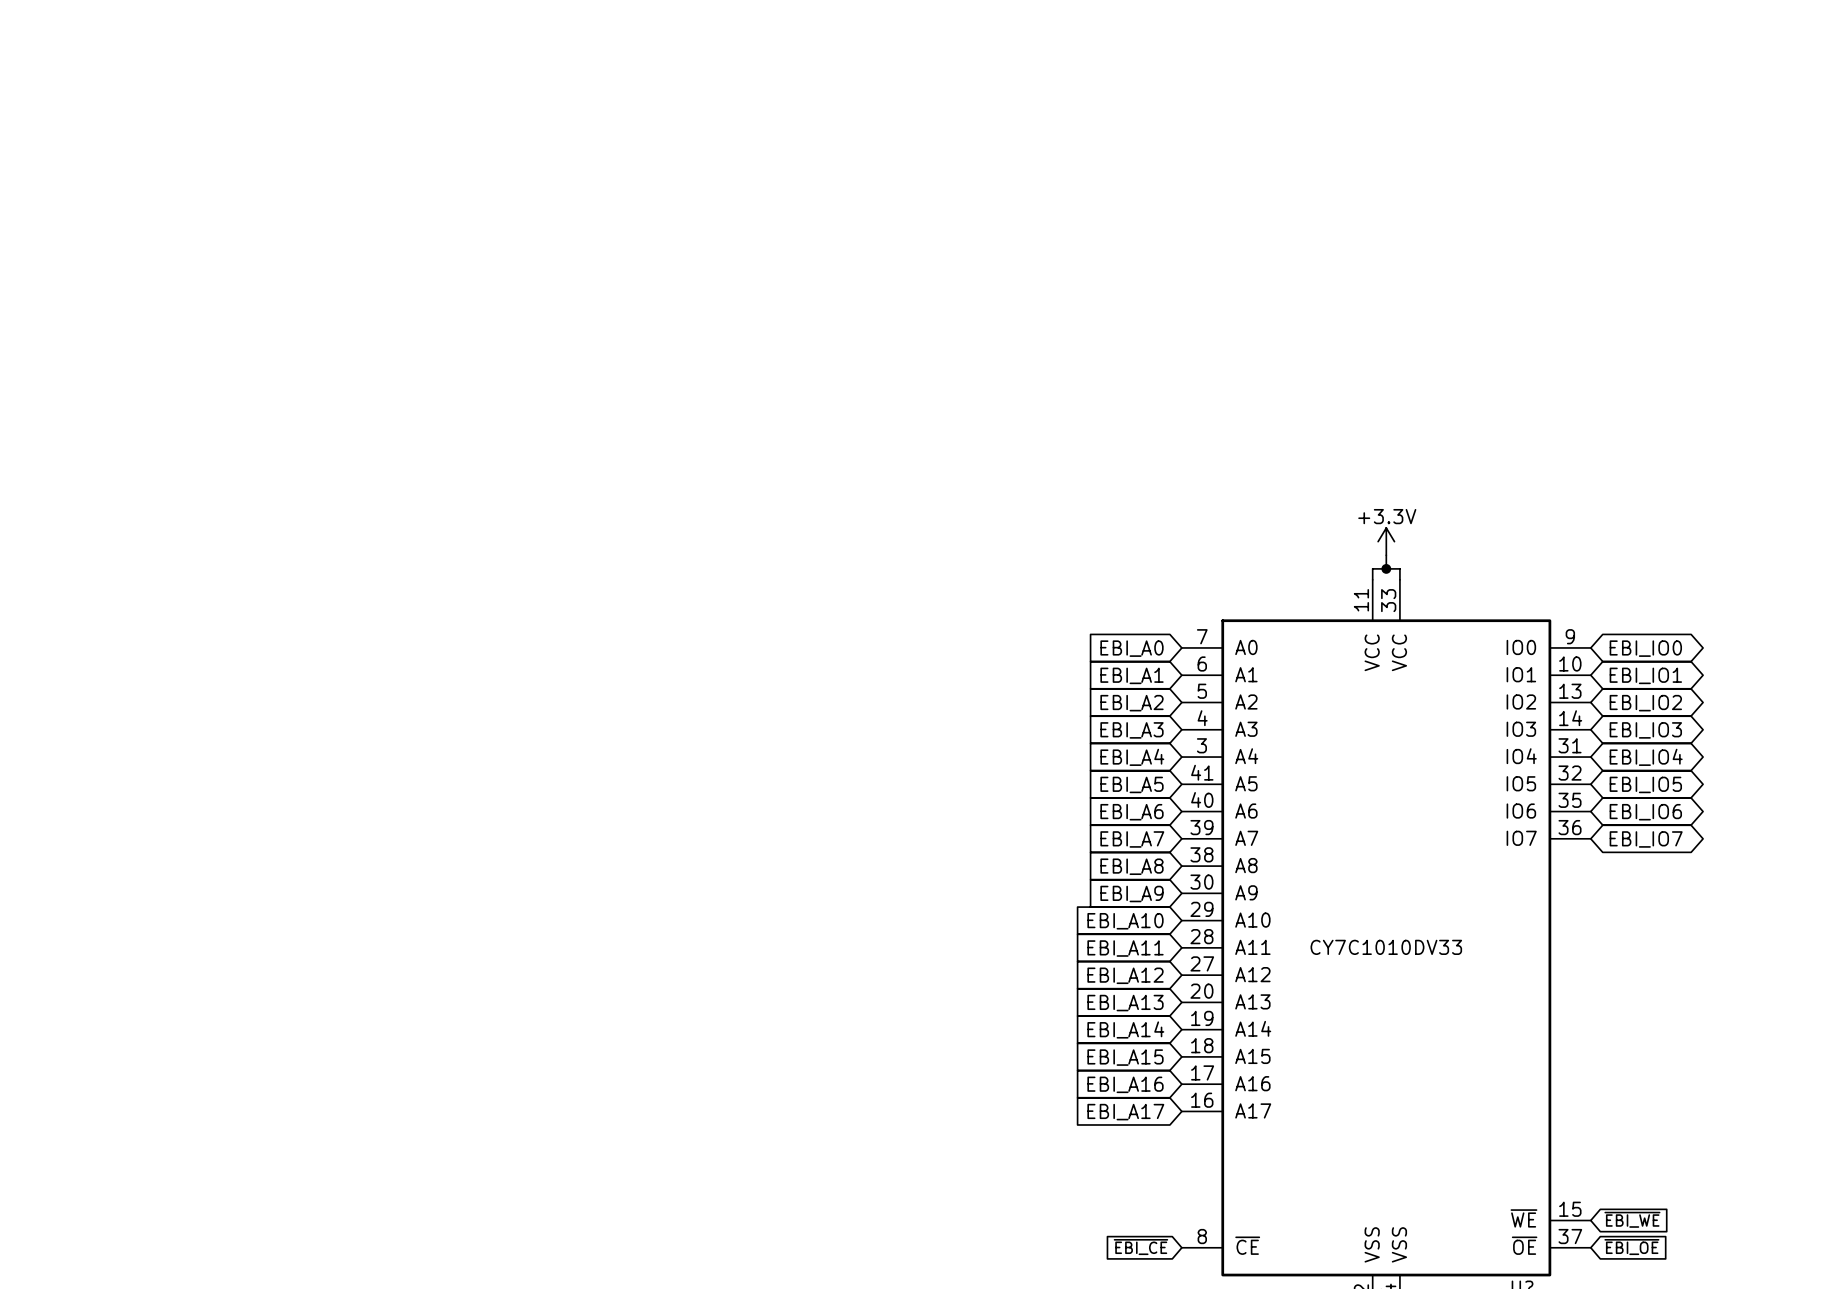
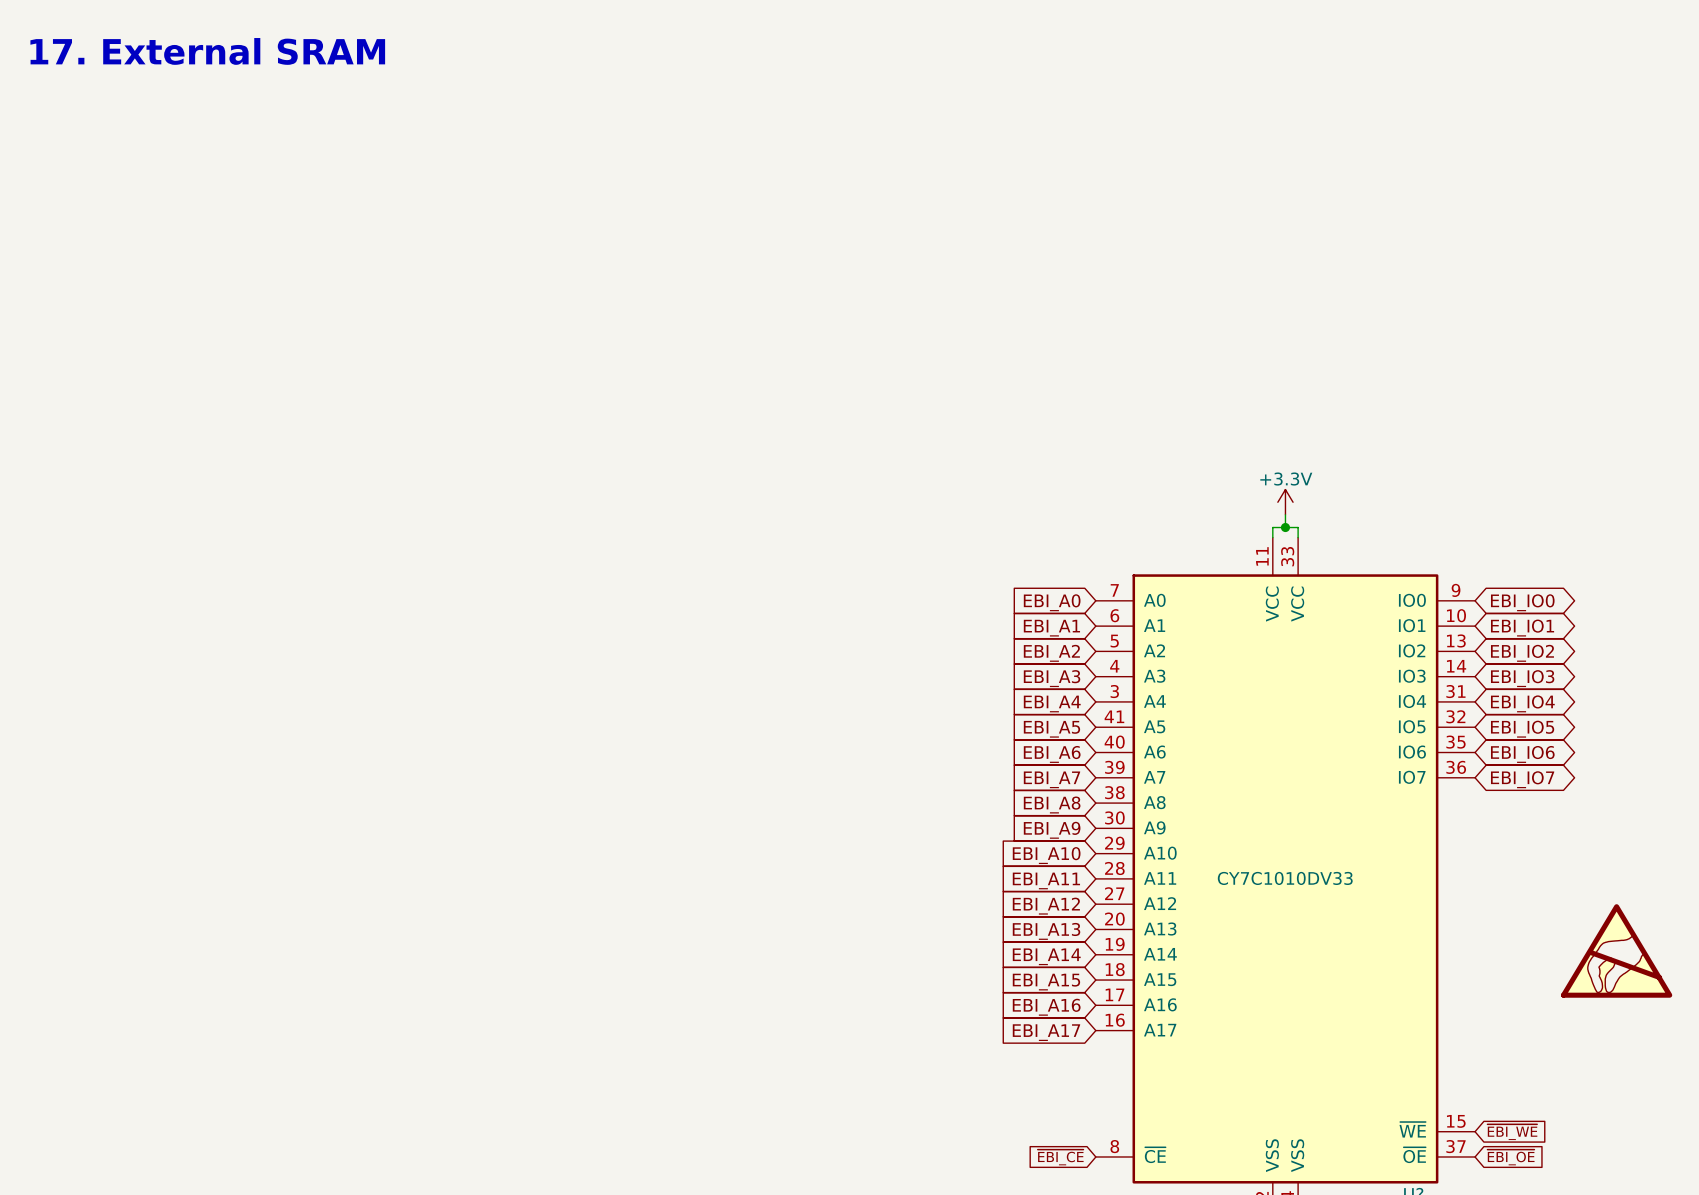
text: none -> 17. External SRAM (207, 51)
power symbol: none -> (1616, 950)

